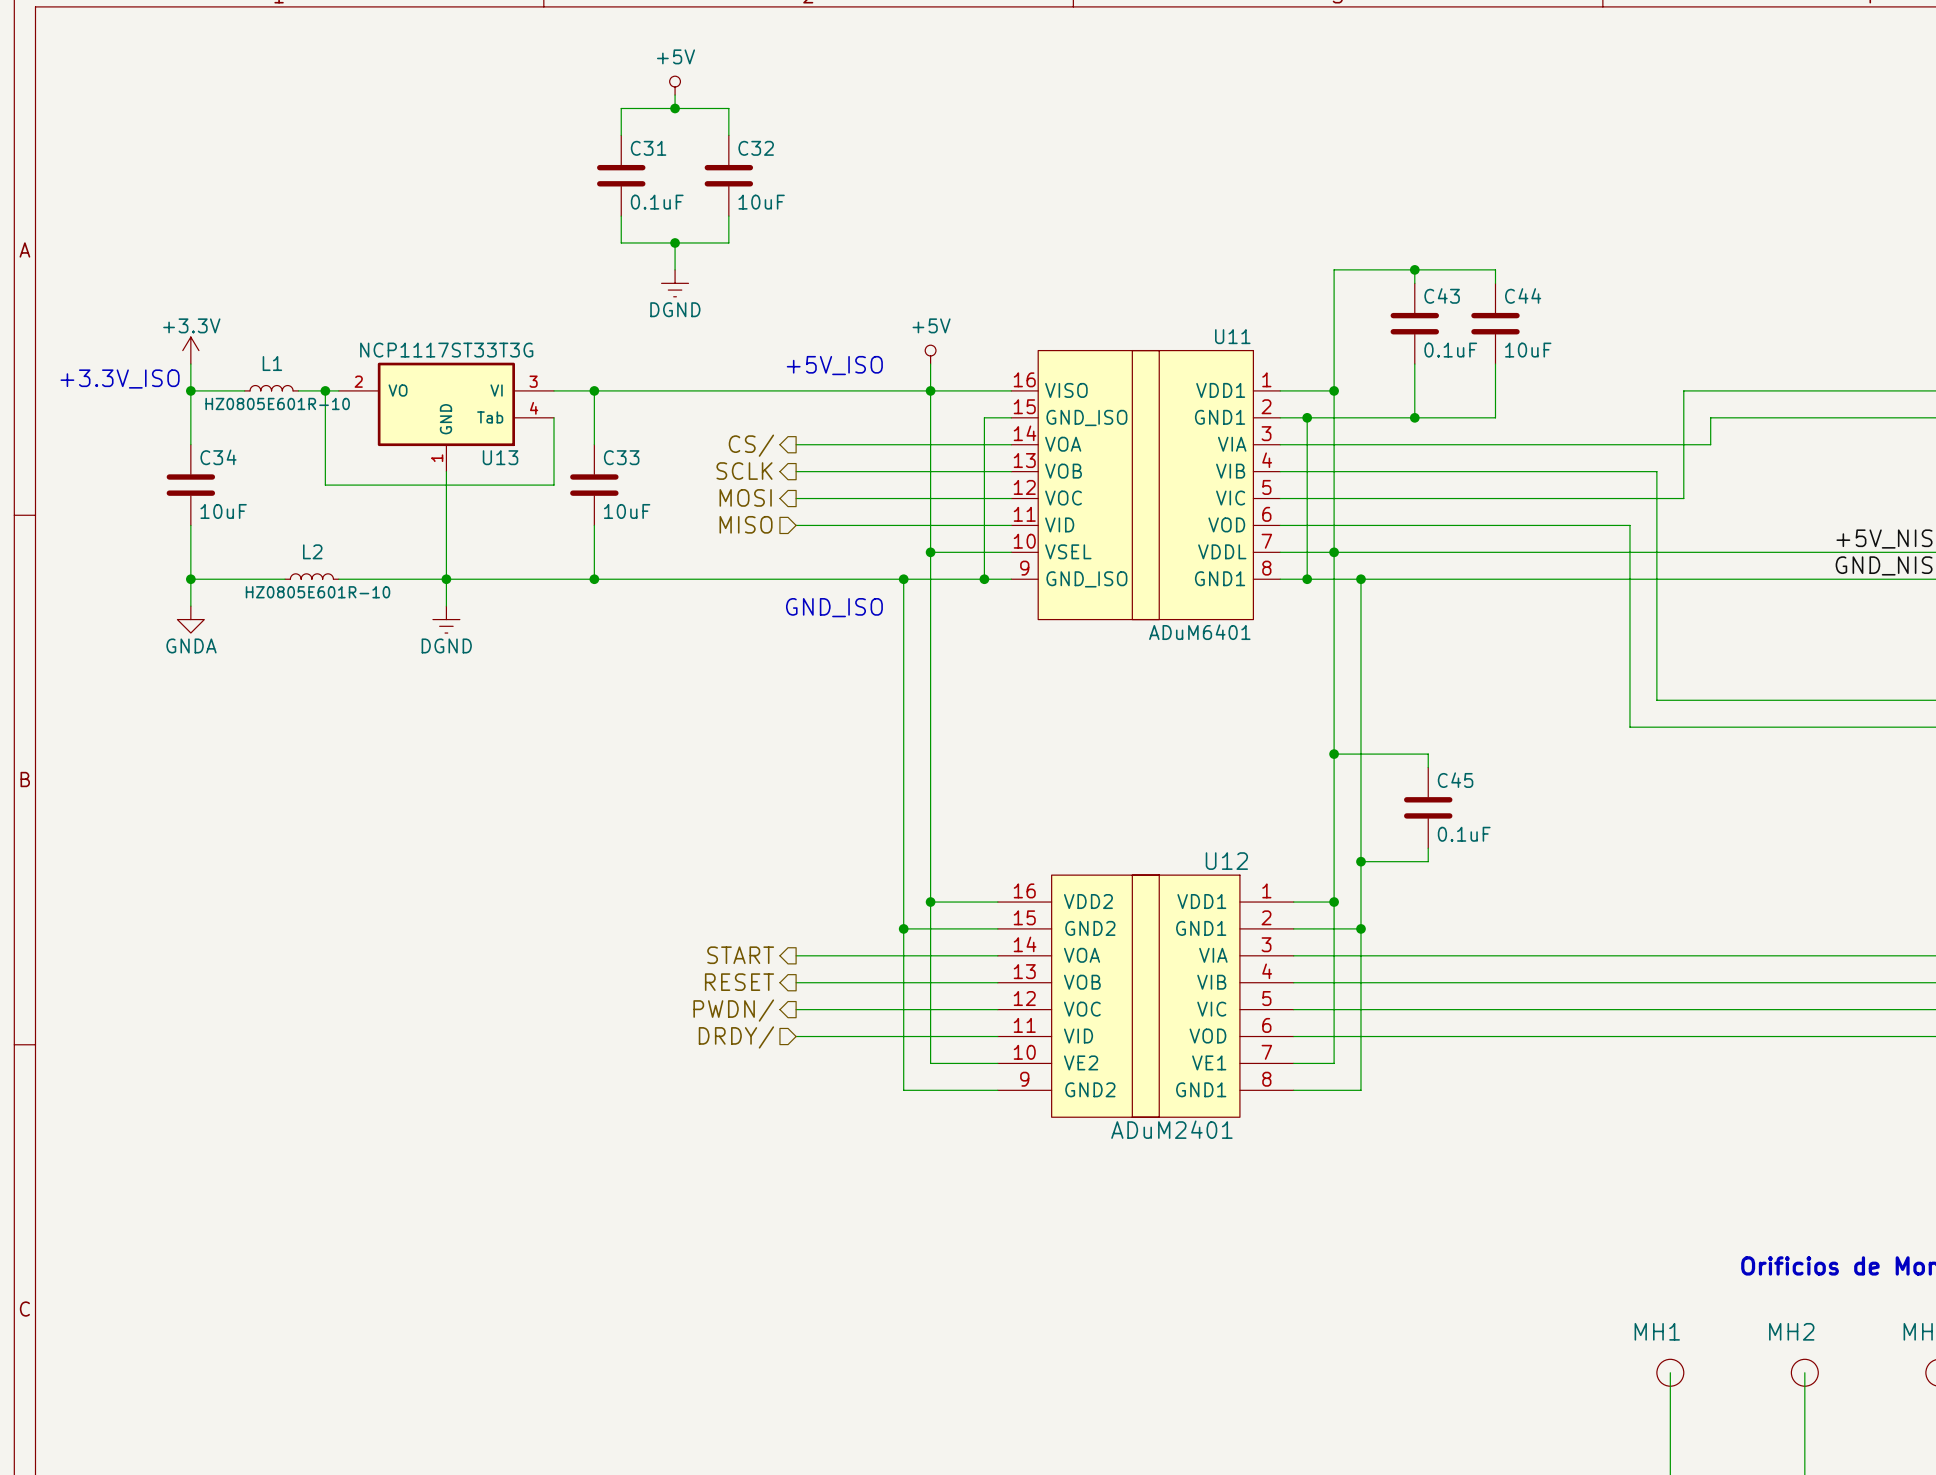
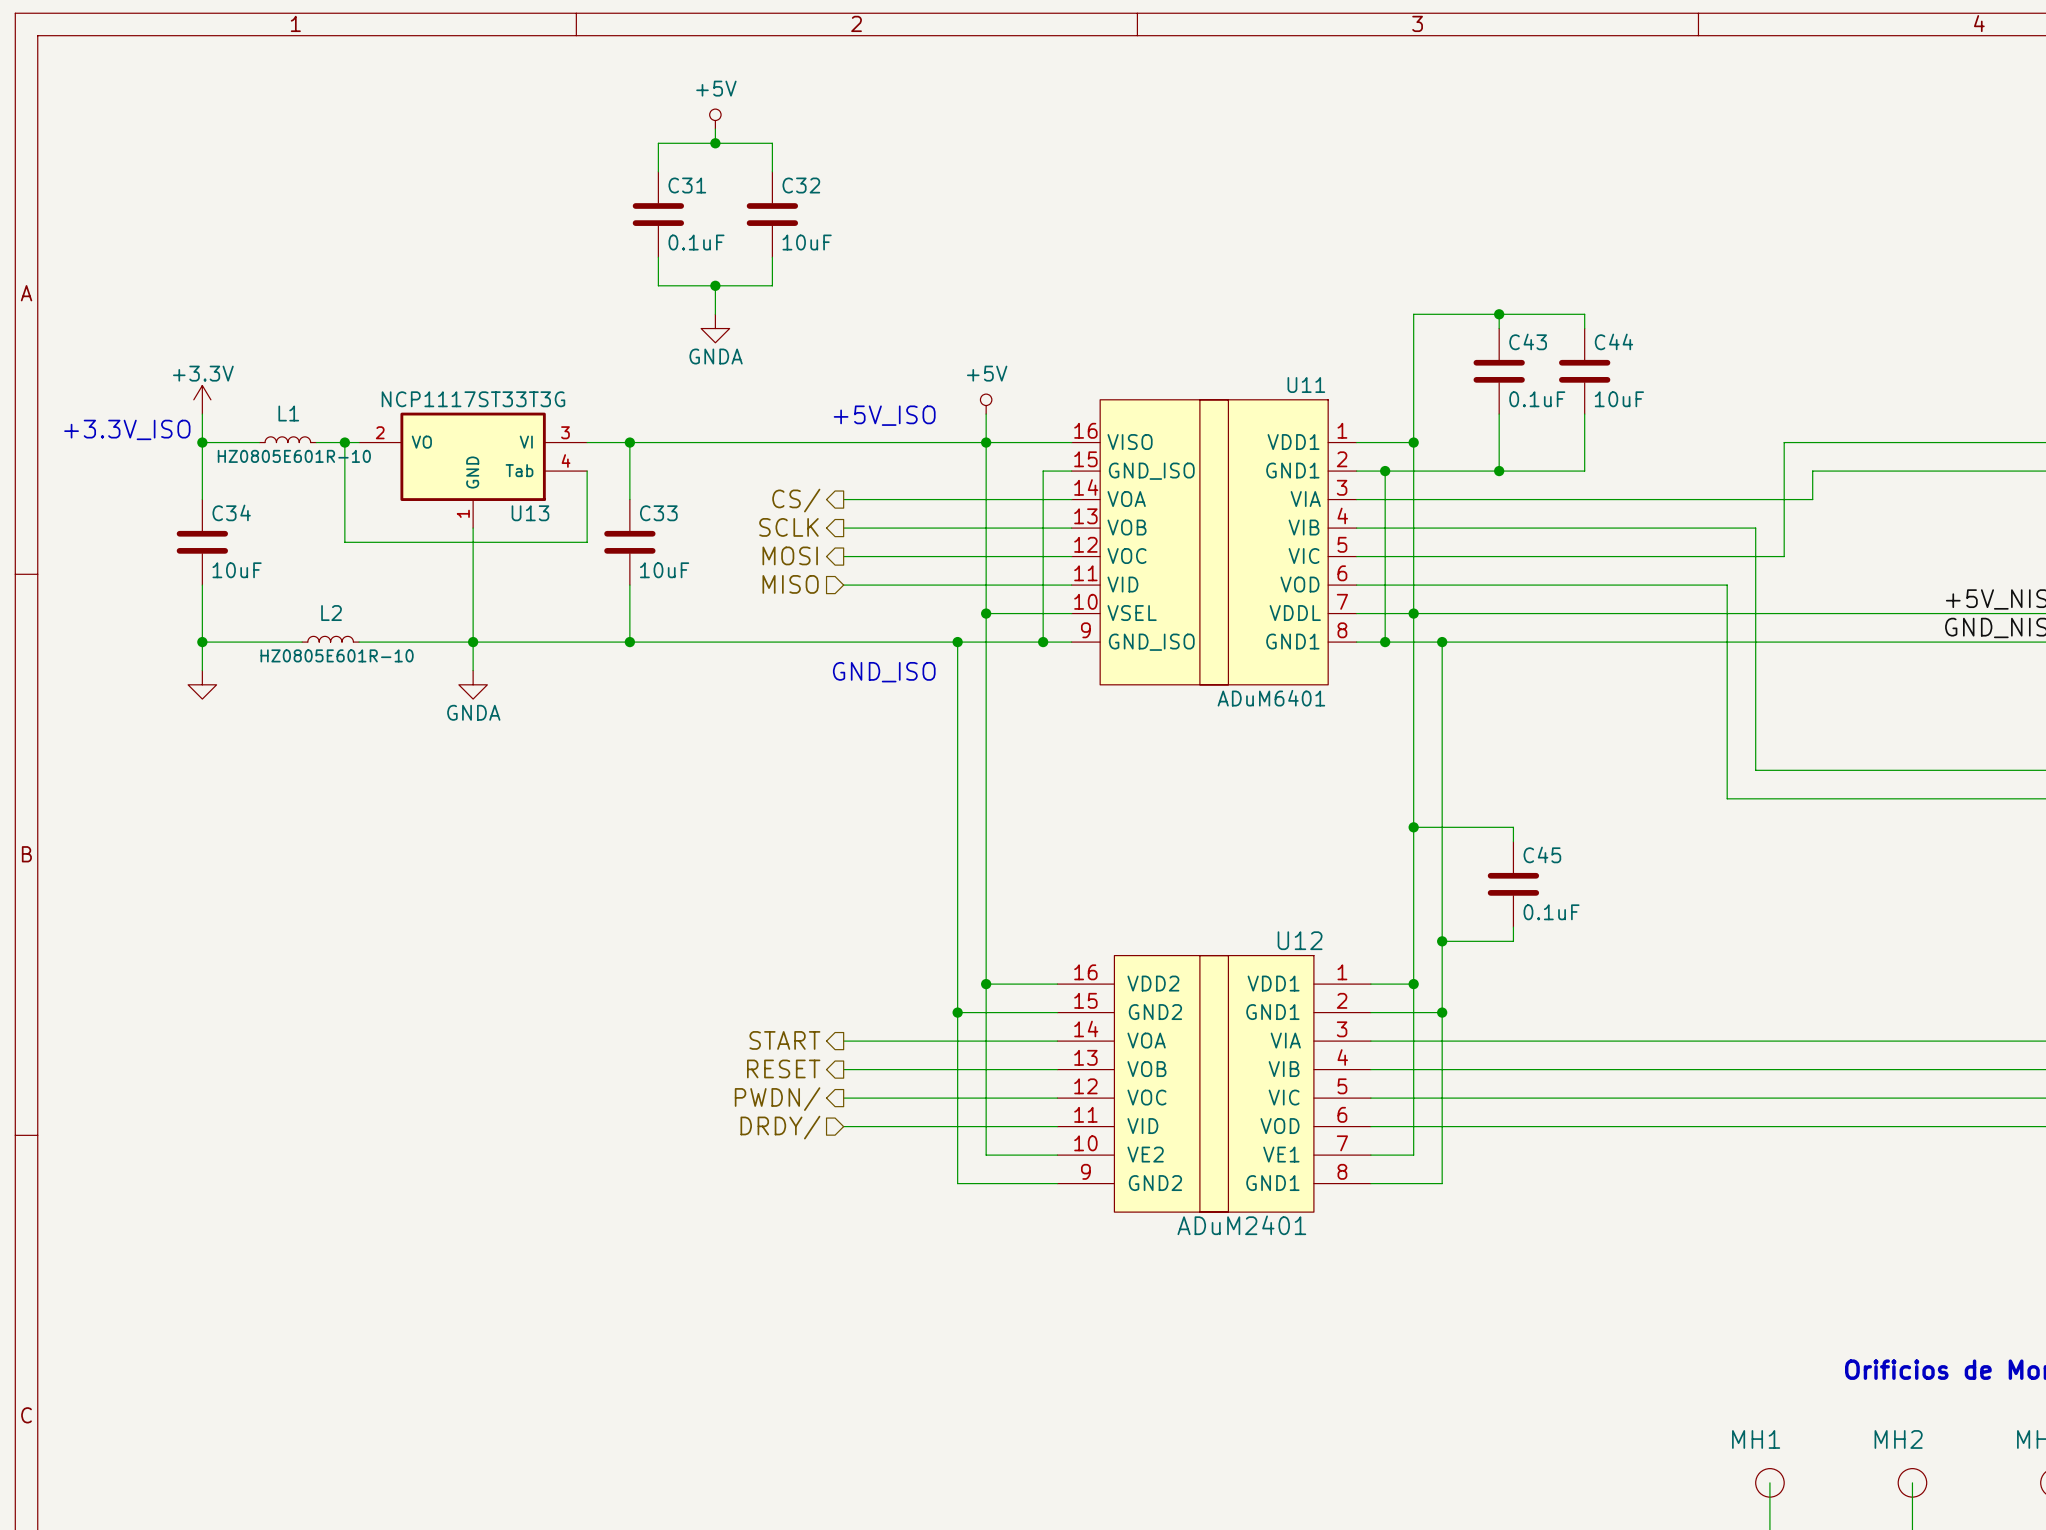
power symbol: DGND (675, 283) -> GNDA (715, 328)
power symbol: DGND (446, 619) -> GNDA (473, 684)
power symbol text: GNDA (191, 645) -> none

